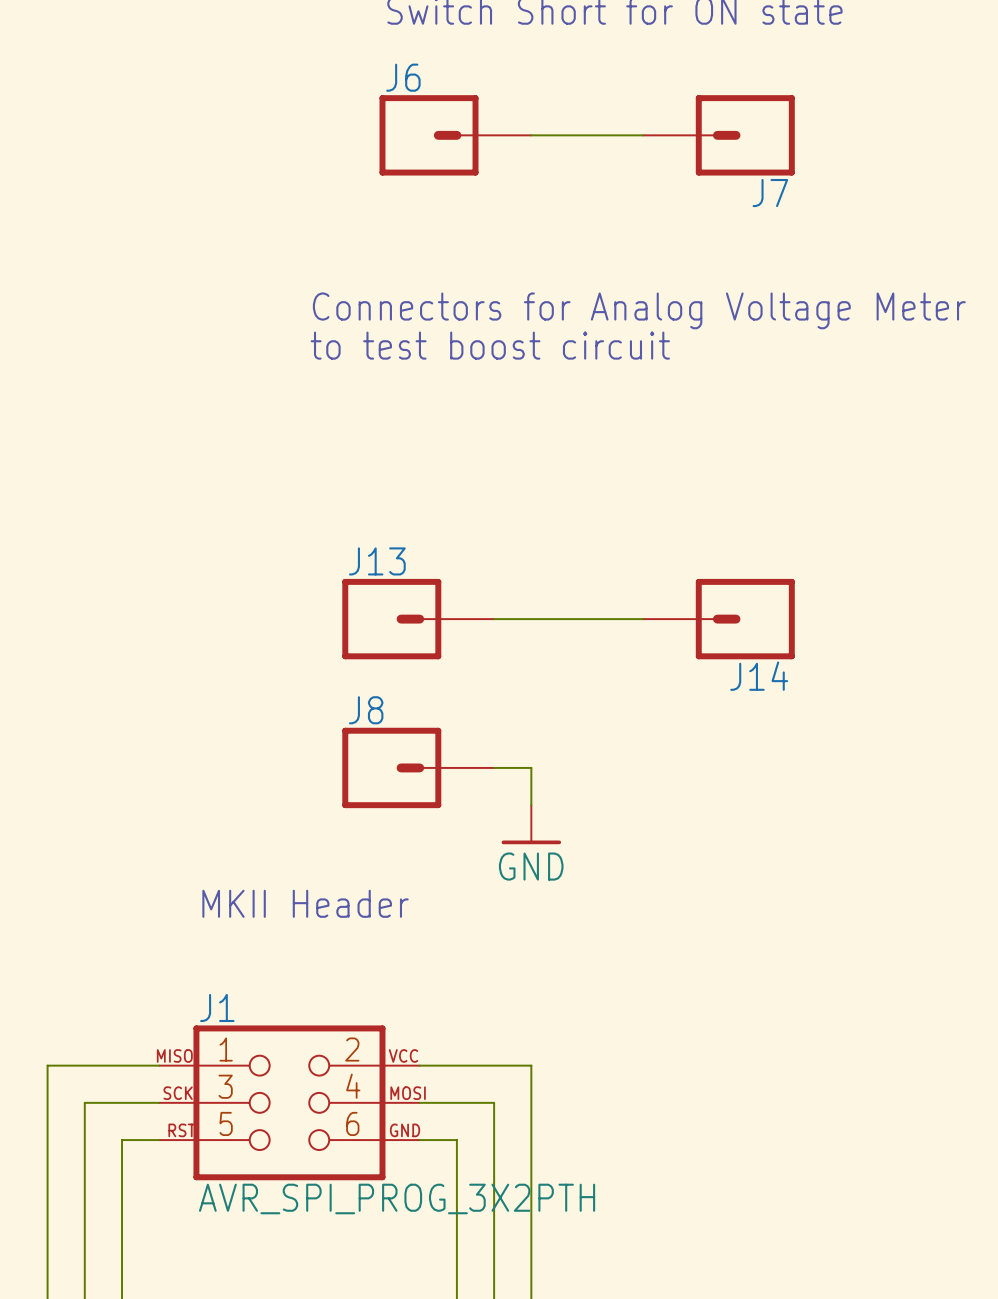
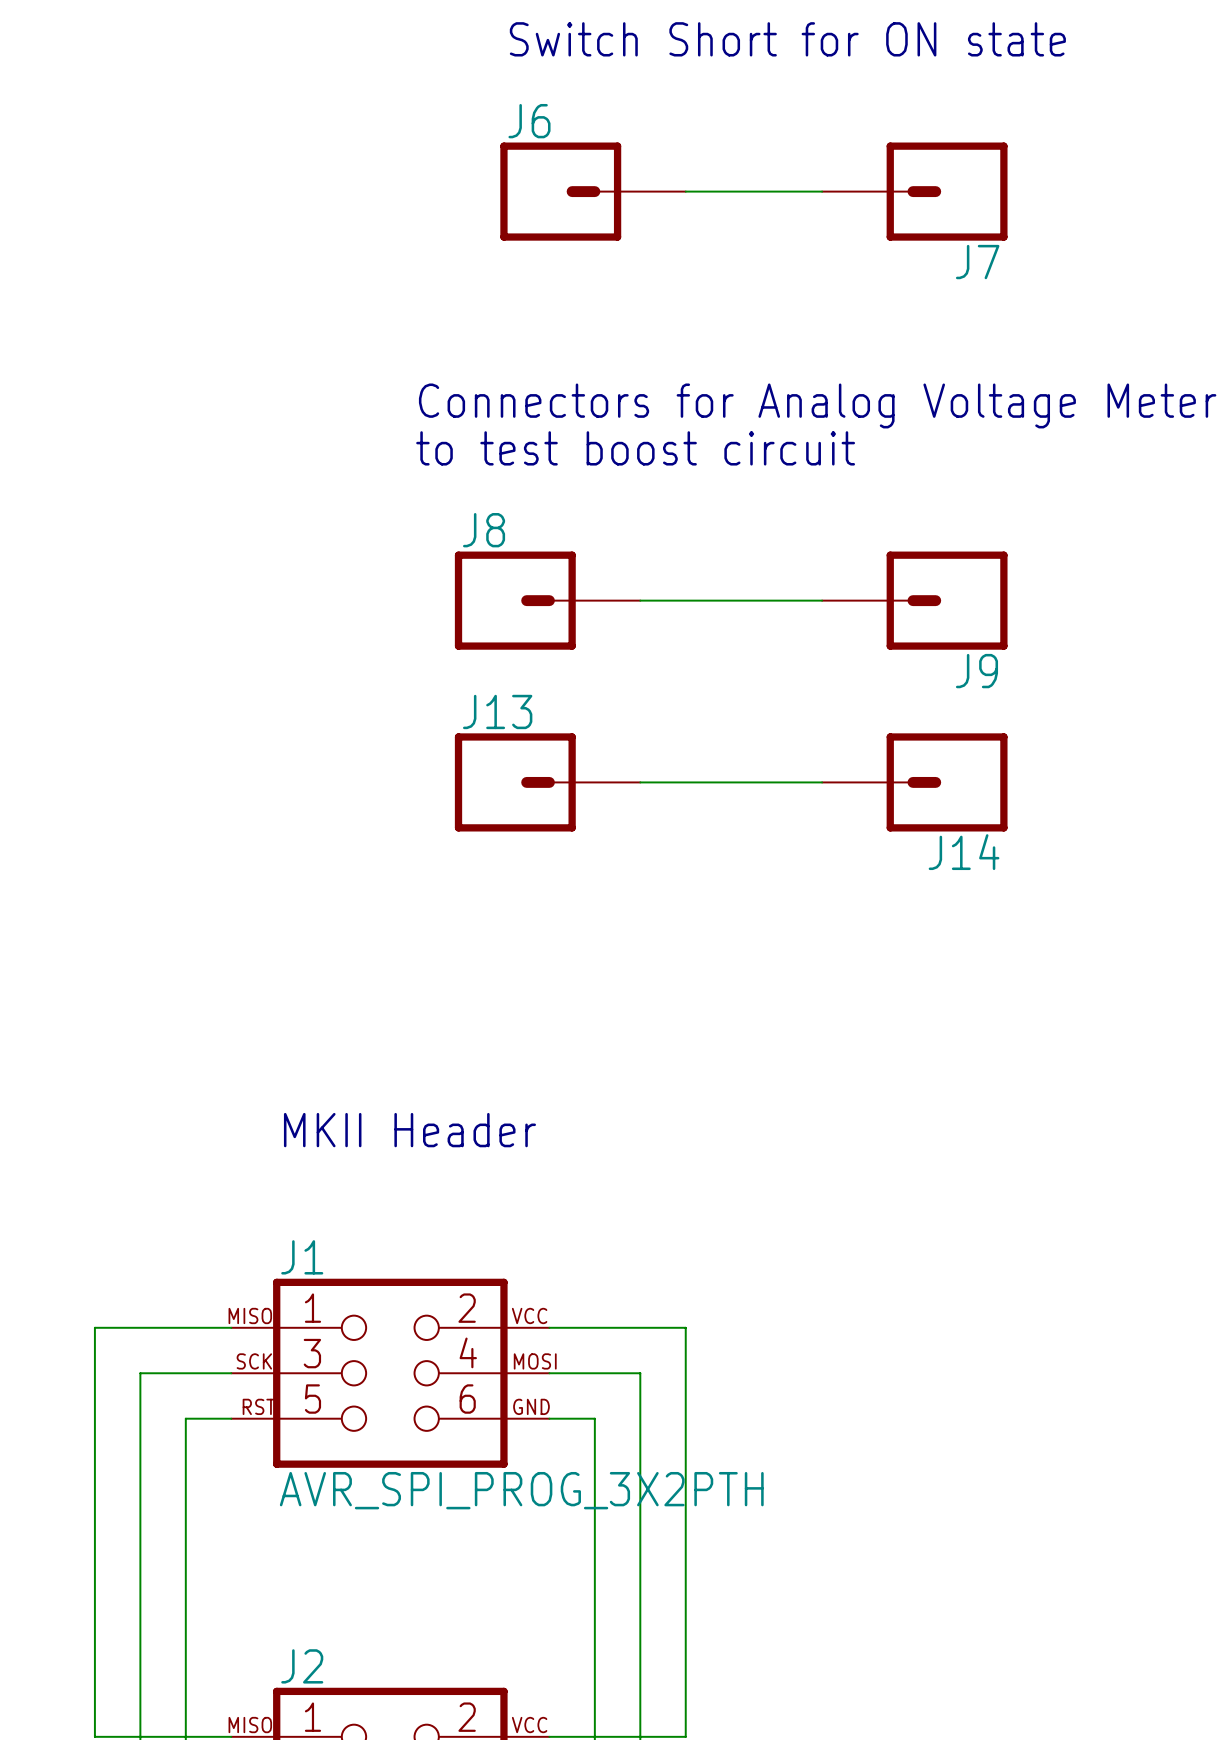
wire: none -> (640, 600) (822, 600)
J9: none -> (914, 600)
J8 position: (418, 767) -> (547, 600)
wire: (494, 767) (531, 767) (531, 805) -> none
power symbol: GND (531, 824) -> none

